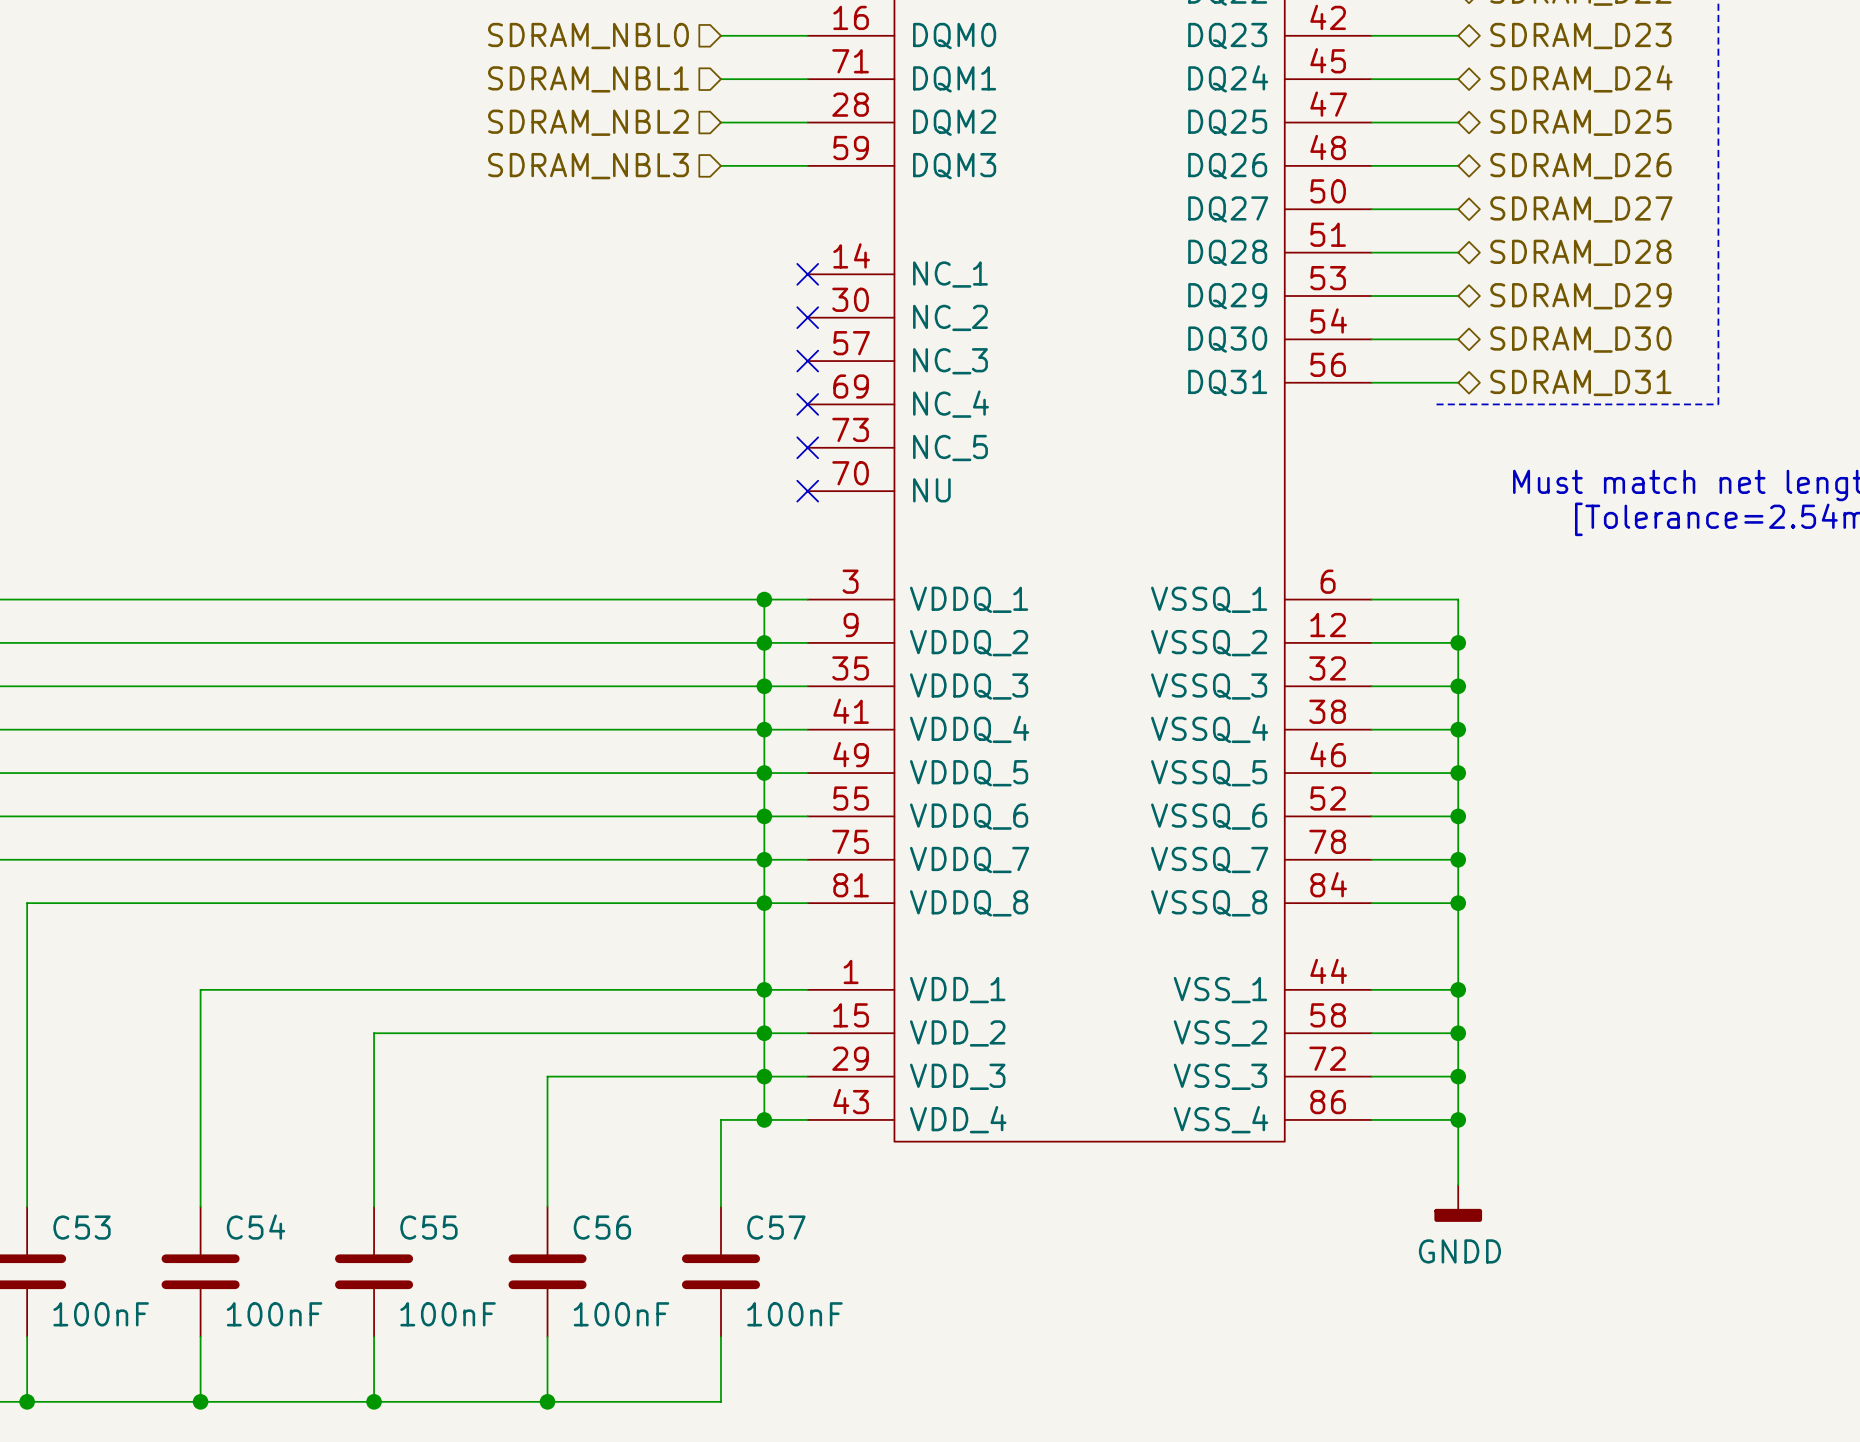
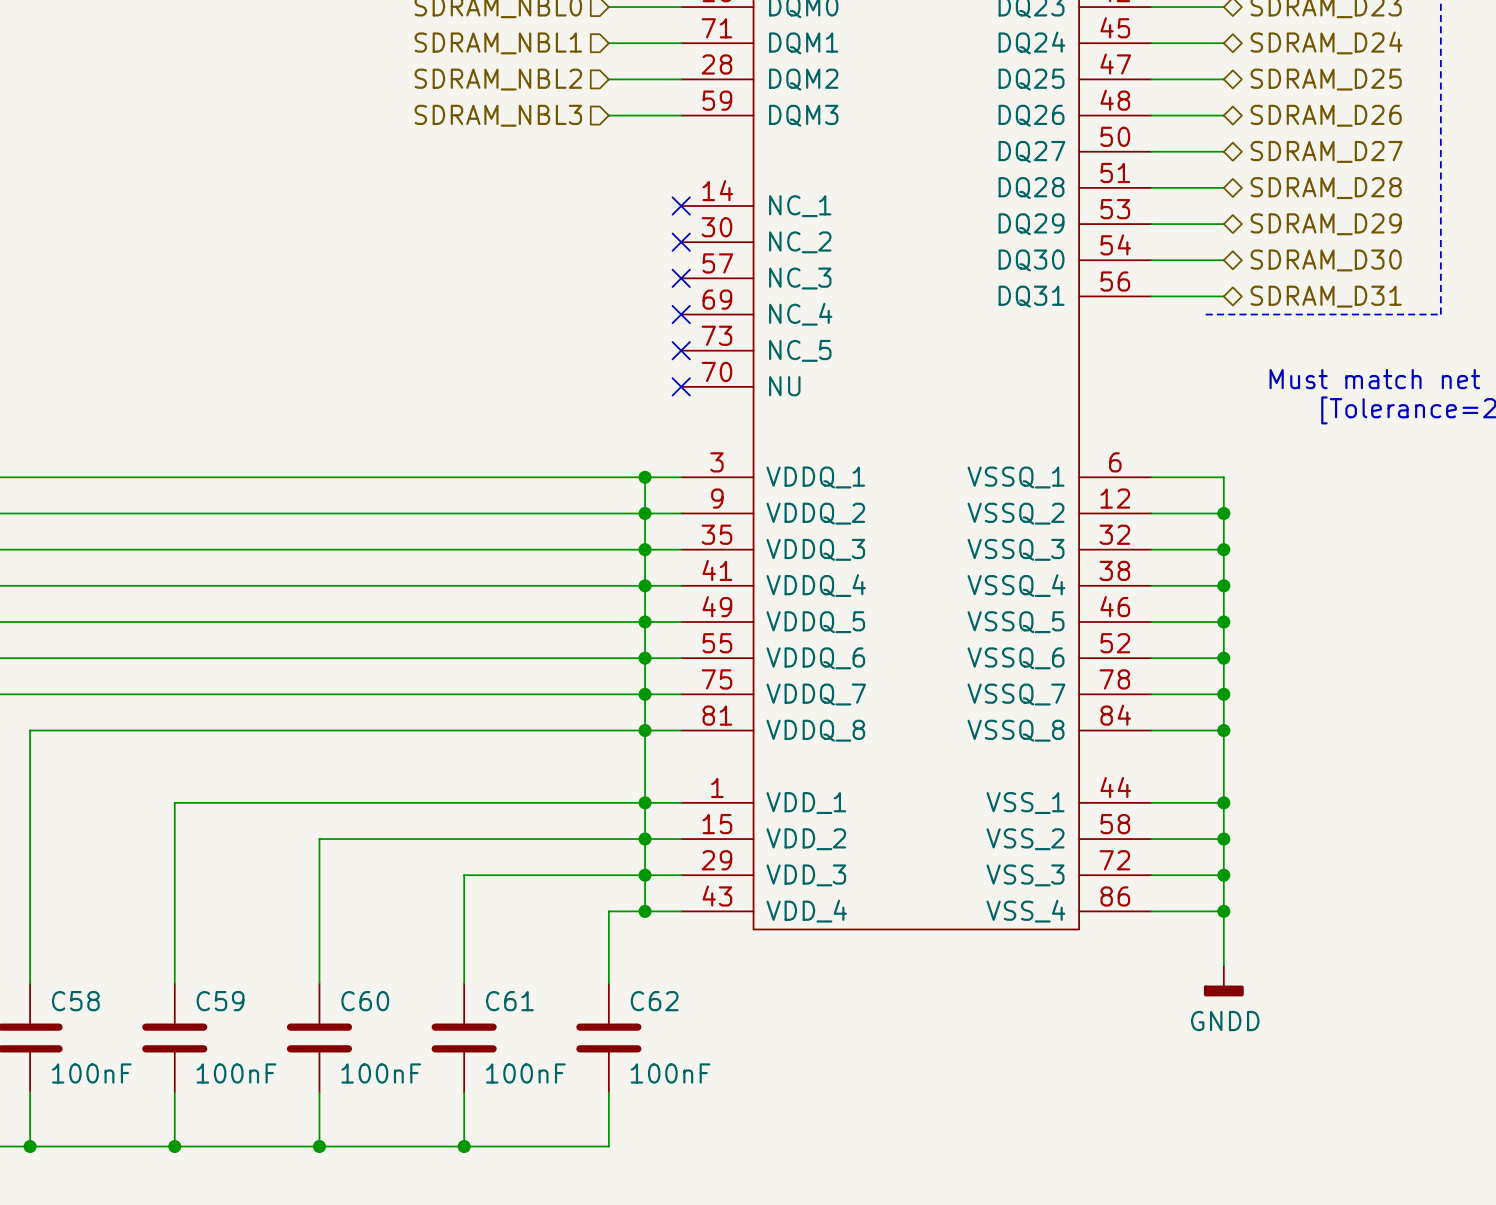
C53 name: C53 (82, 1227) -> C58 (75, 1001)
C54 name: C54 (255, 1227) -> C59 (220, 1001)
C55 name: C55 (428, 1227) -> C60 (365, 1001)
C56 name: C56 (602, 1227) -> C61 (509, 1001)
C57 name: C57 (776, 1227) -> C62 (654, 1001)

